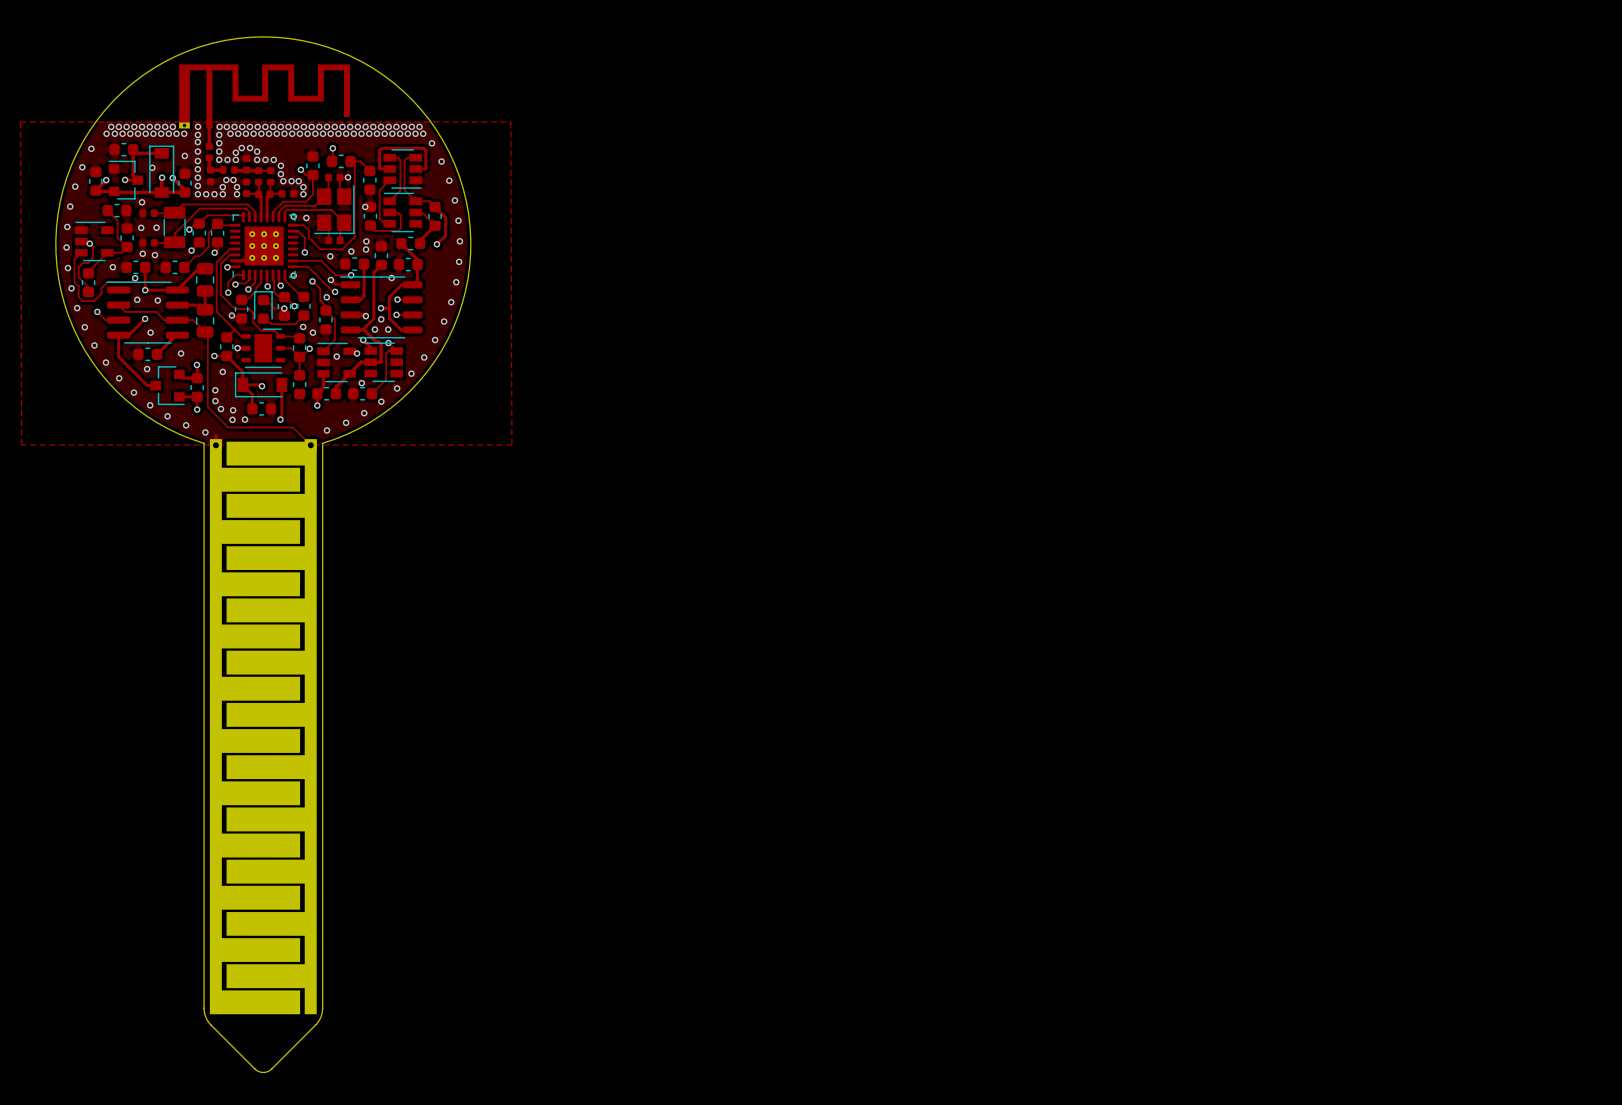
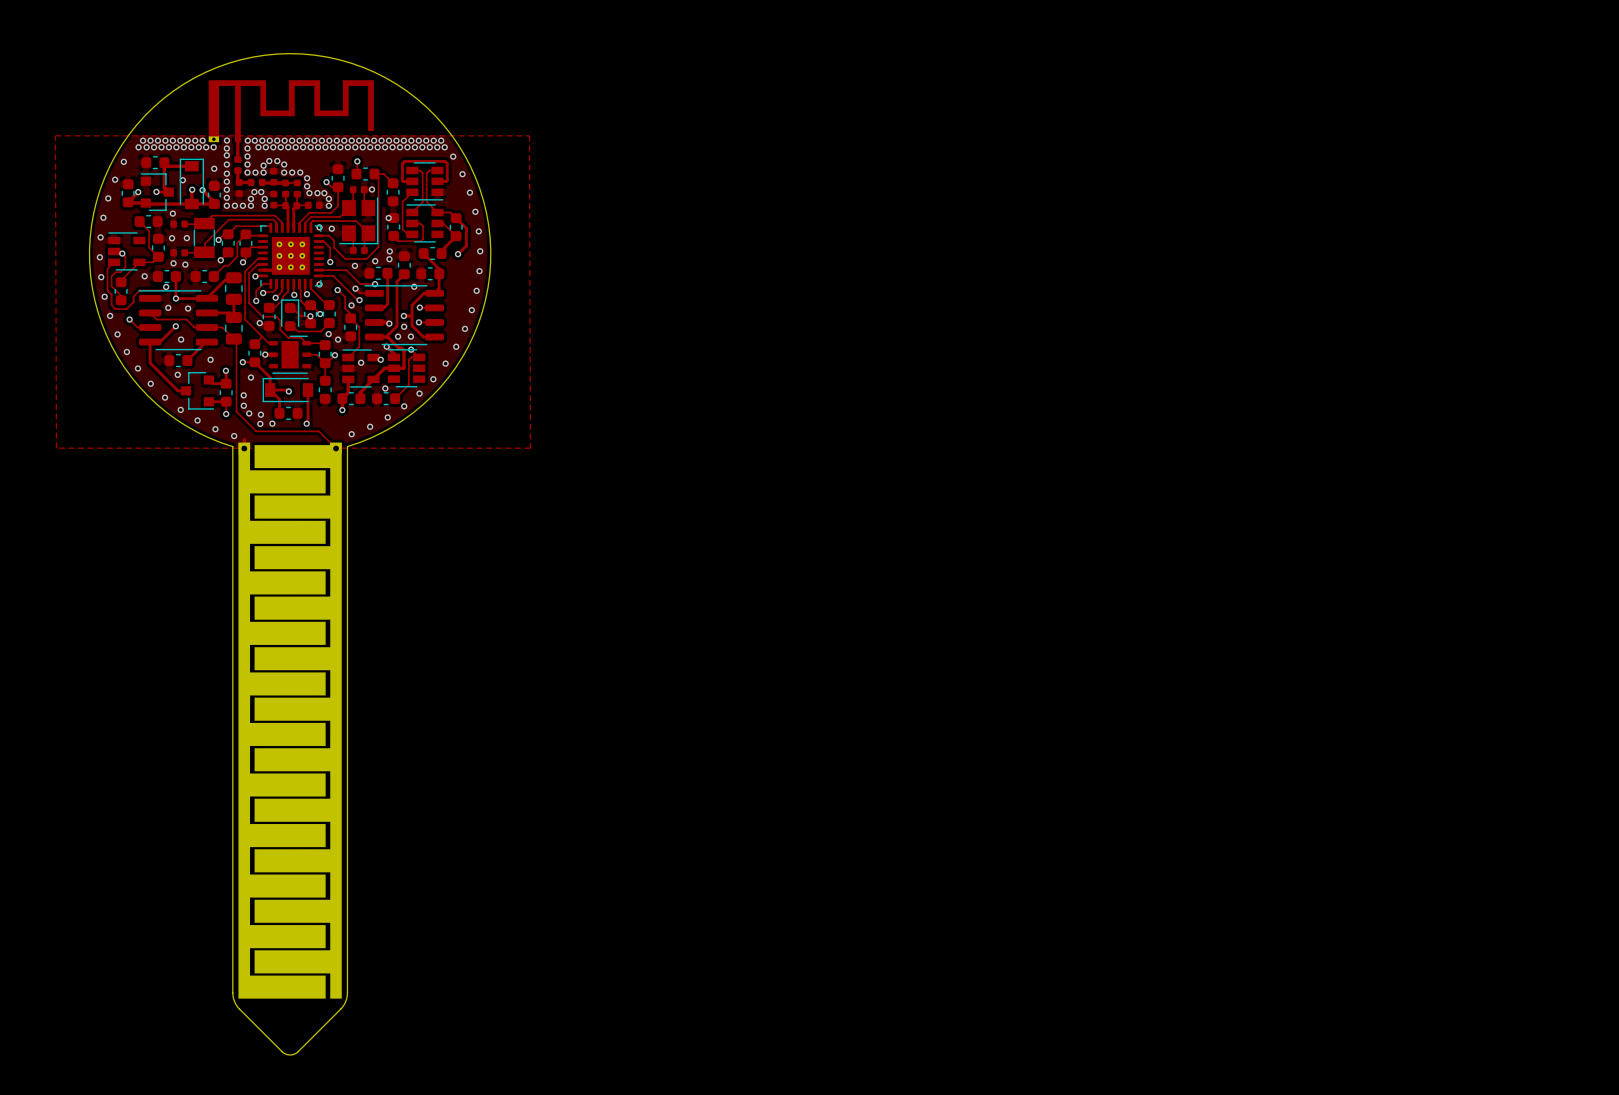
track: none -> (262, 247) (251, 247) (245, 252)

